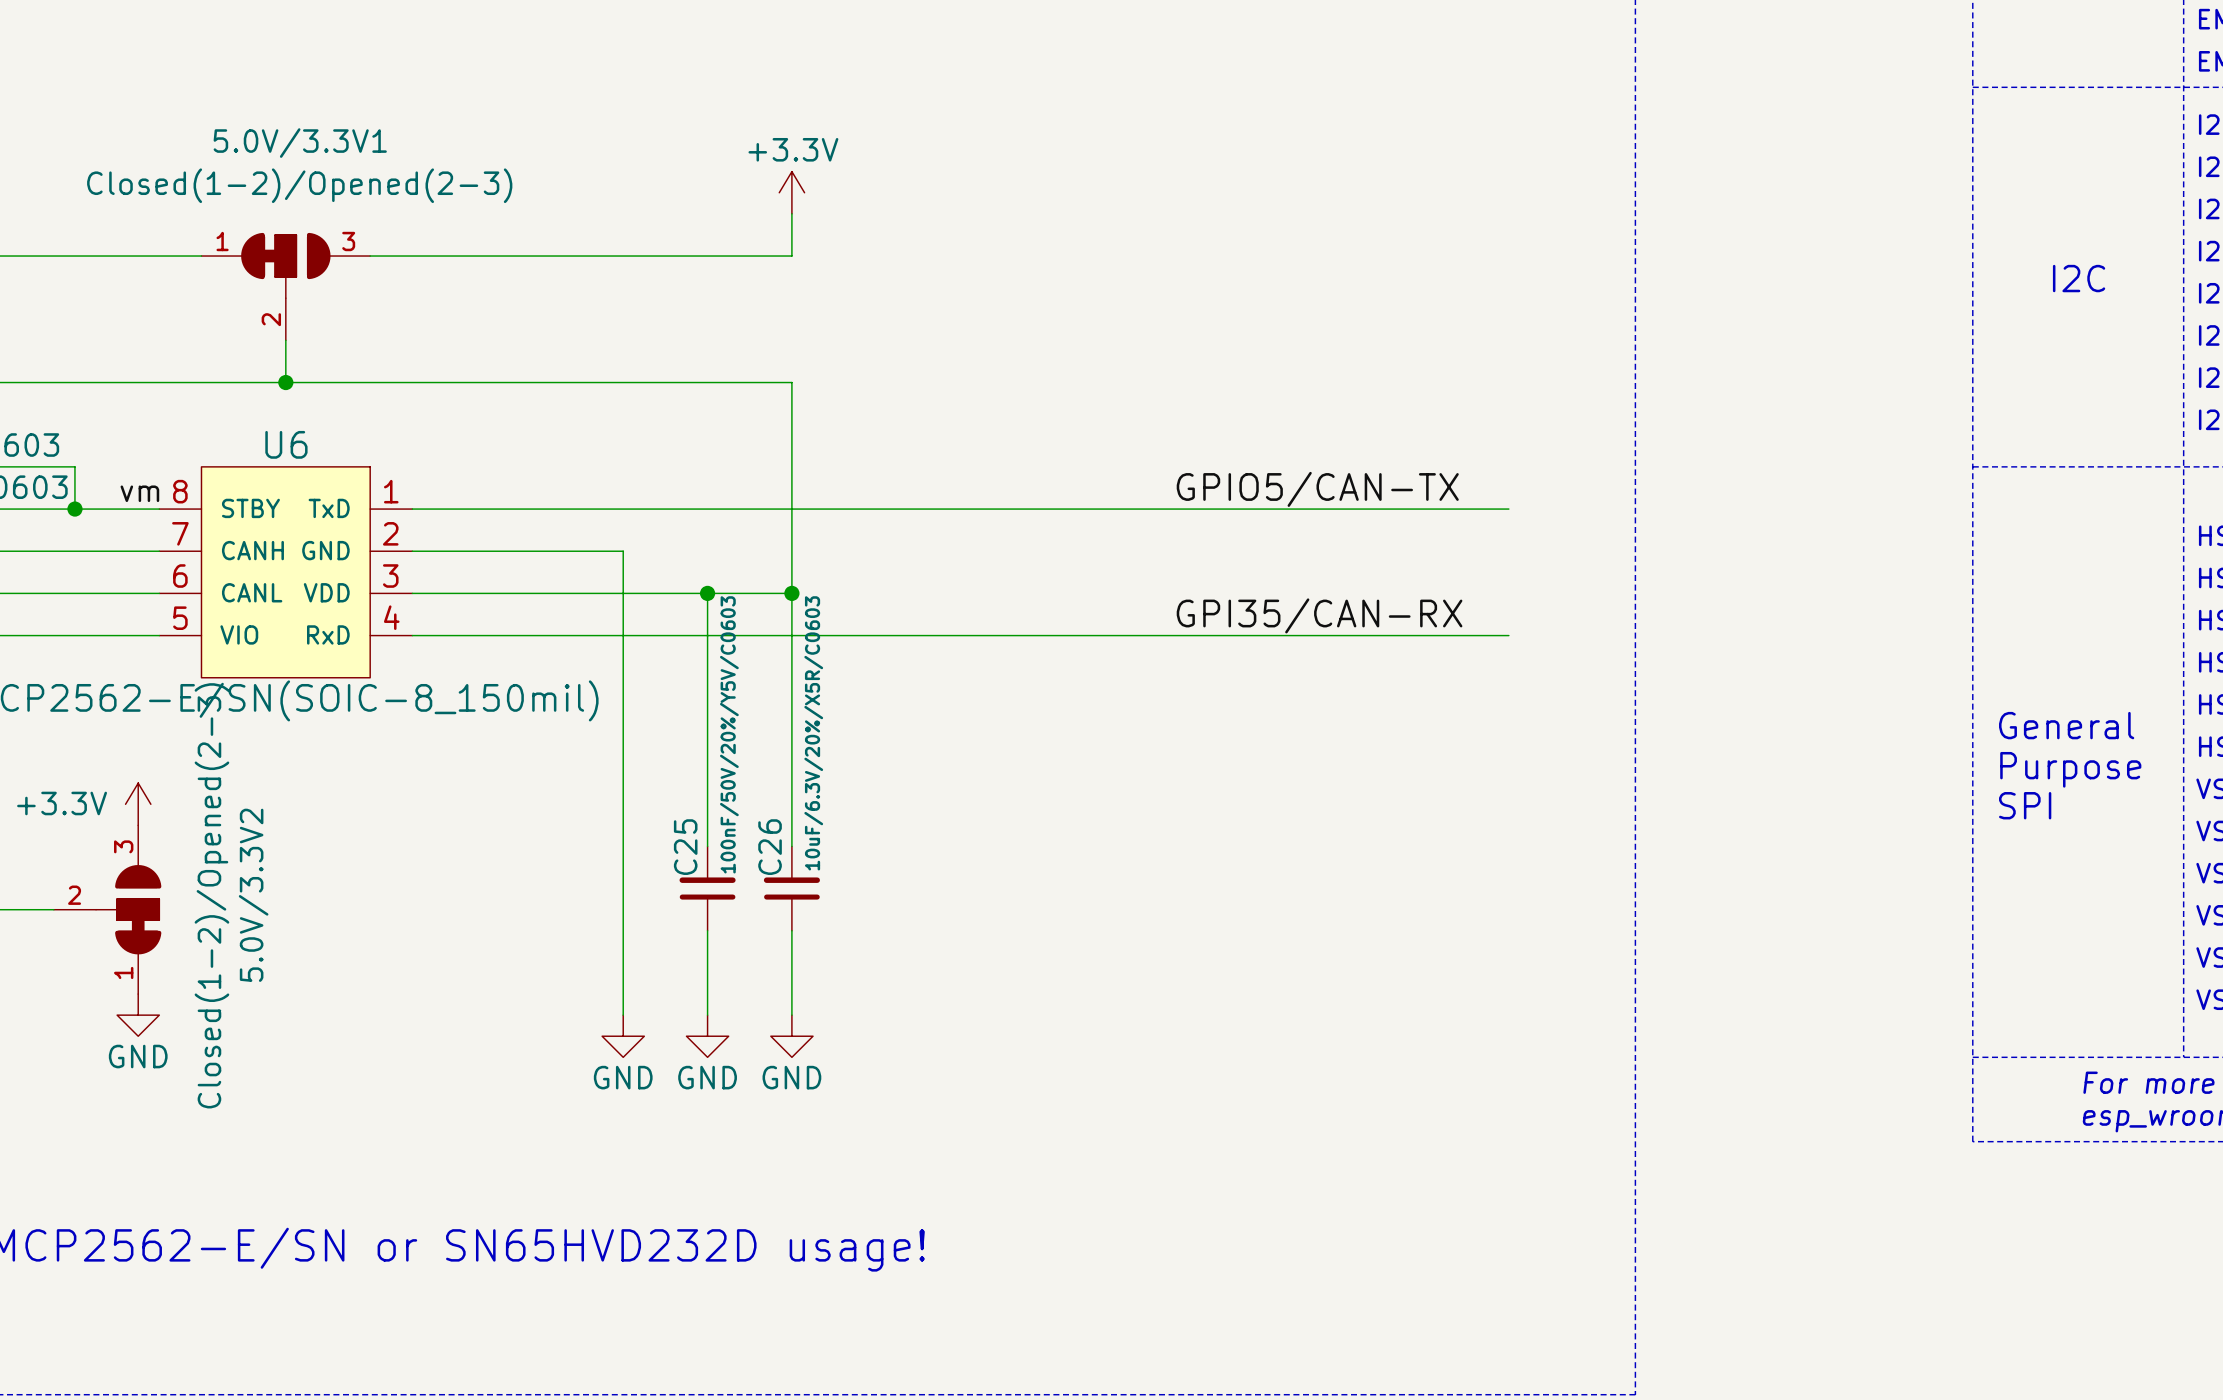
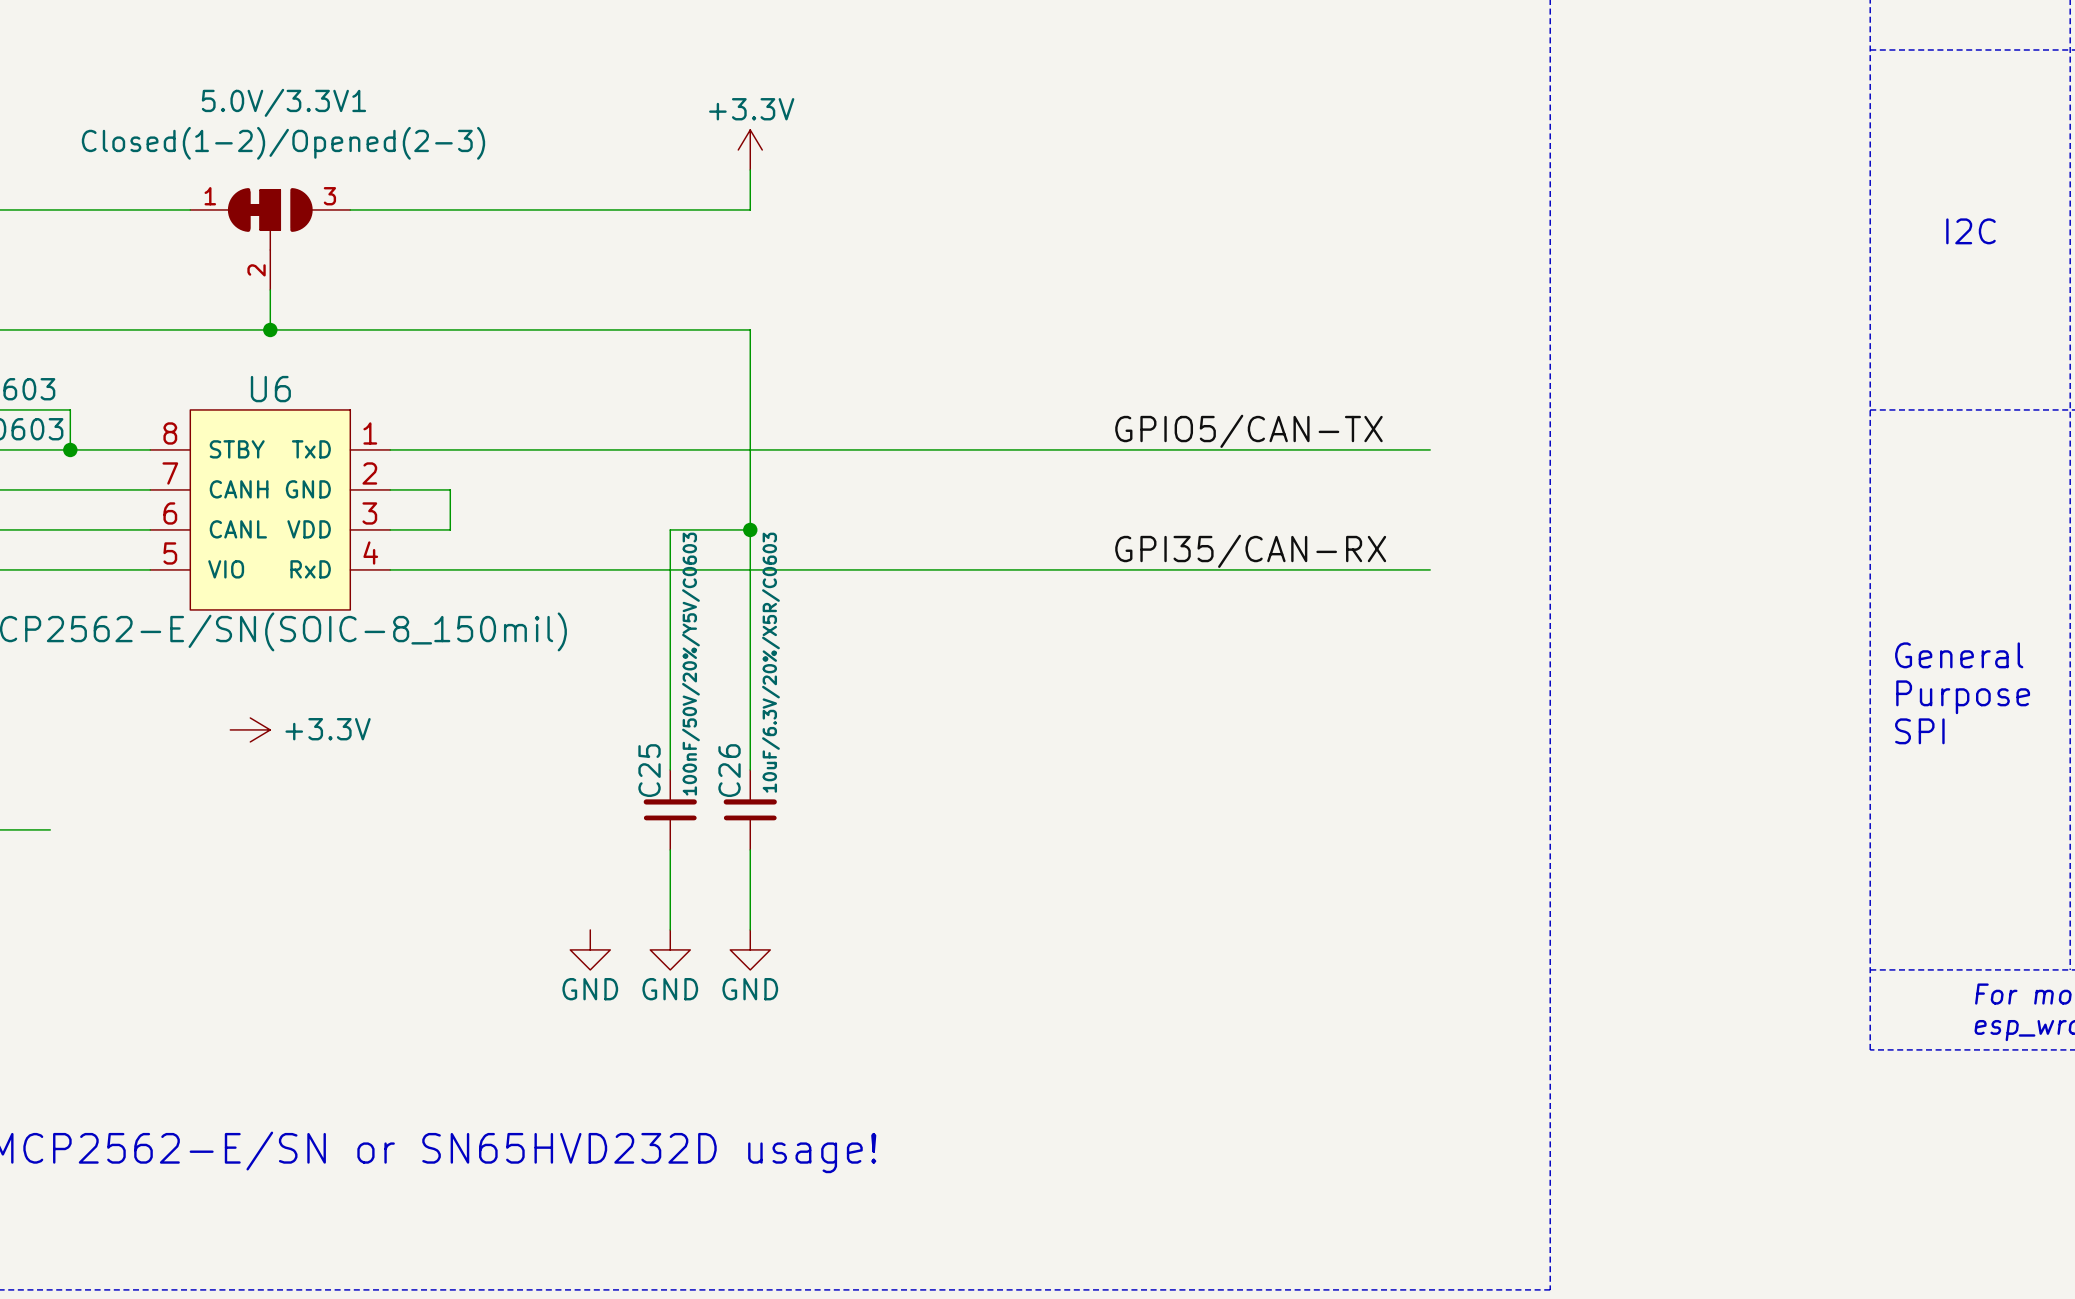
label: vm (139, 493) -> none
wire: (475, 551) (623, 551) (623, 1015) -> none
wire: (475, 593) (707, 593) -> (450, 529) (450, 489)
junction: (707, 593) -> none
power symbol text position: +3.3V (62, 803) -> +3.3V (328, 729)
power symbol rotation: 0° (138, 804) -> 90° clockwise (250, 729)
power symbol position: +3.3V (138, 804) -> +3.3V (250, 729)
5.0V/3.3V2: Closed(1-2)/Opened(2-3) (107, 909) -> none
power symbol: GND (138, 1015) -> none

